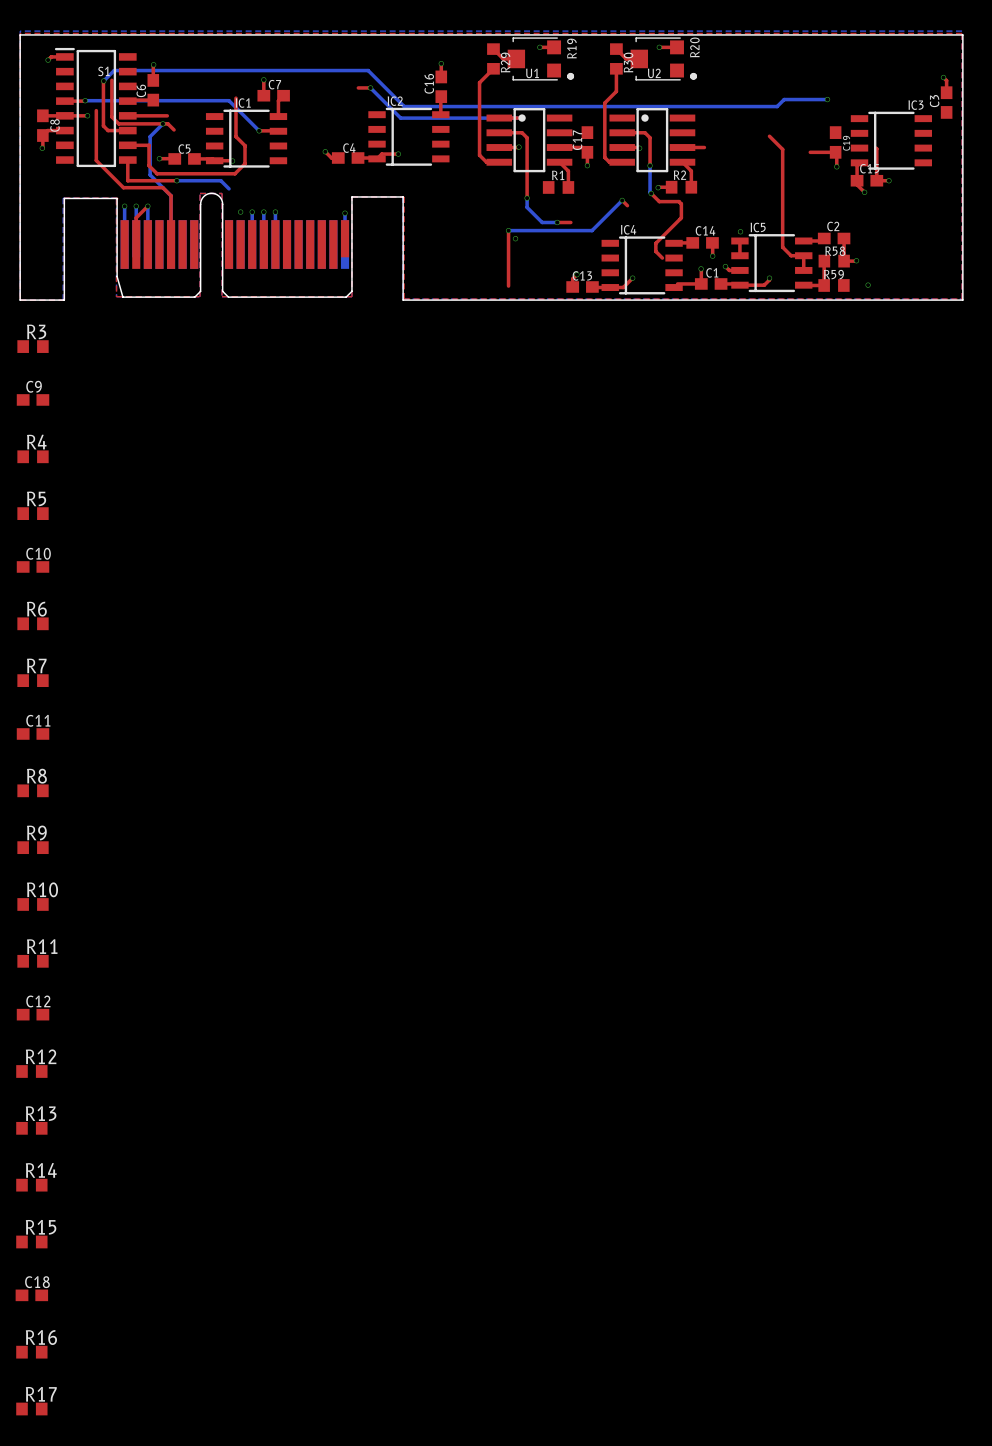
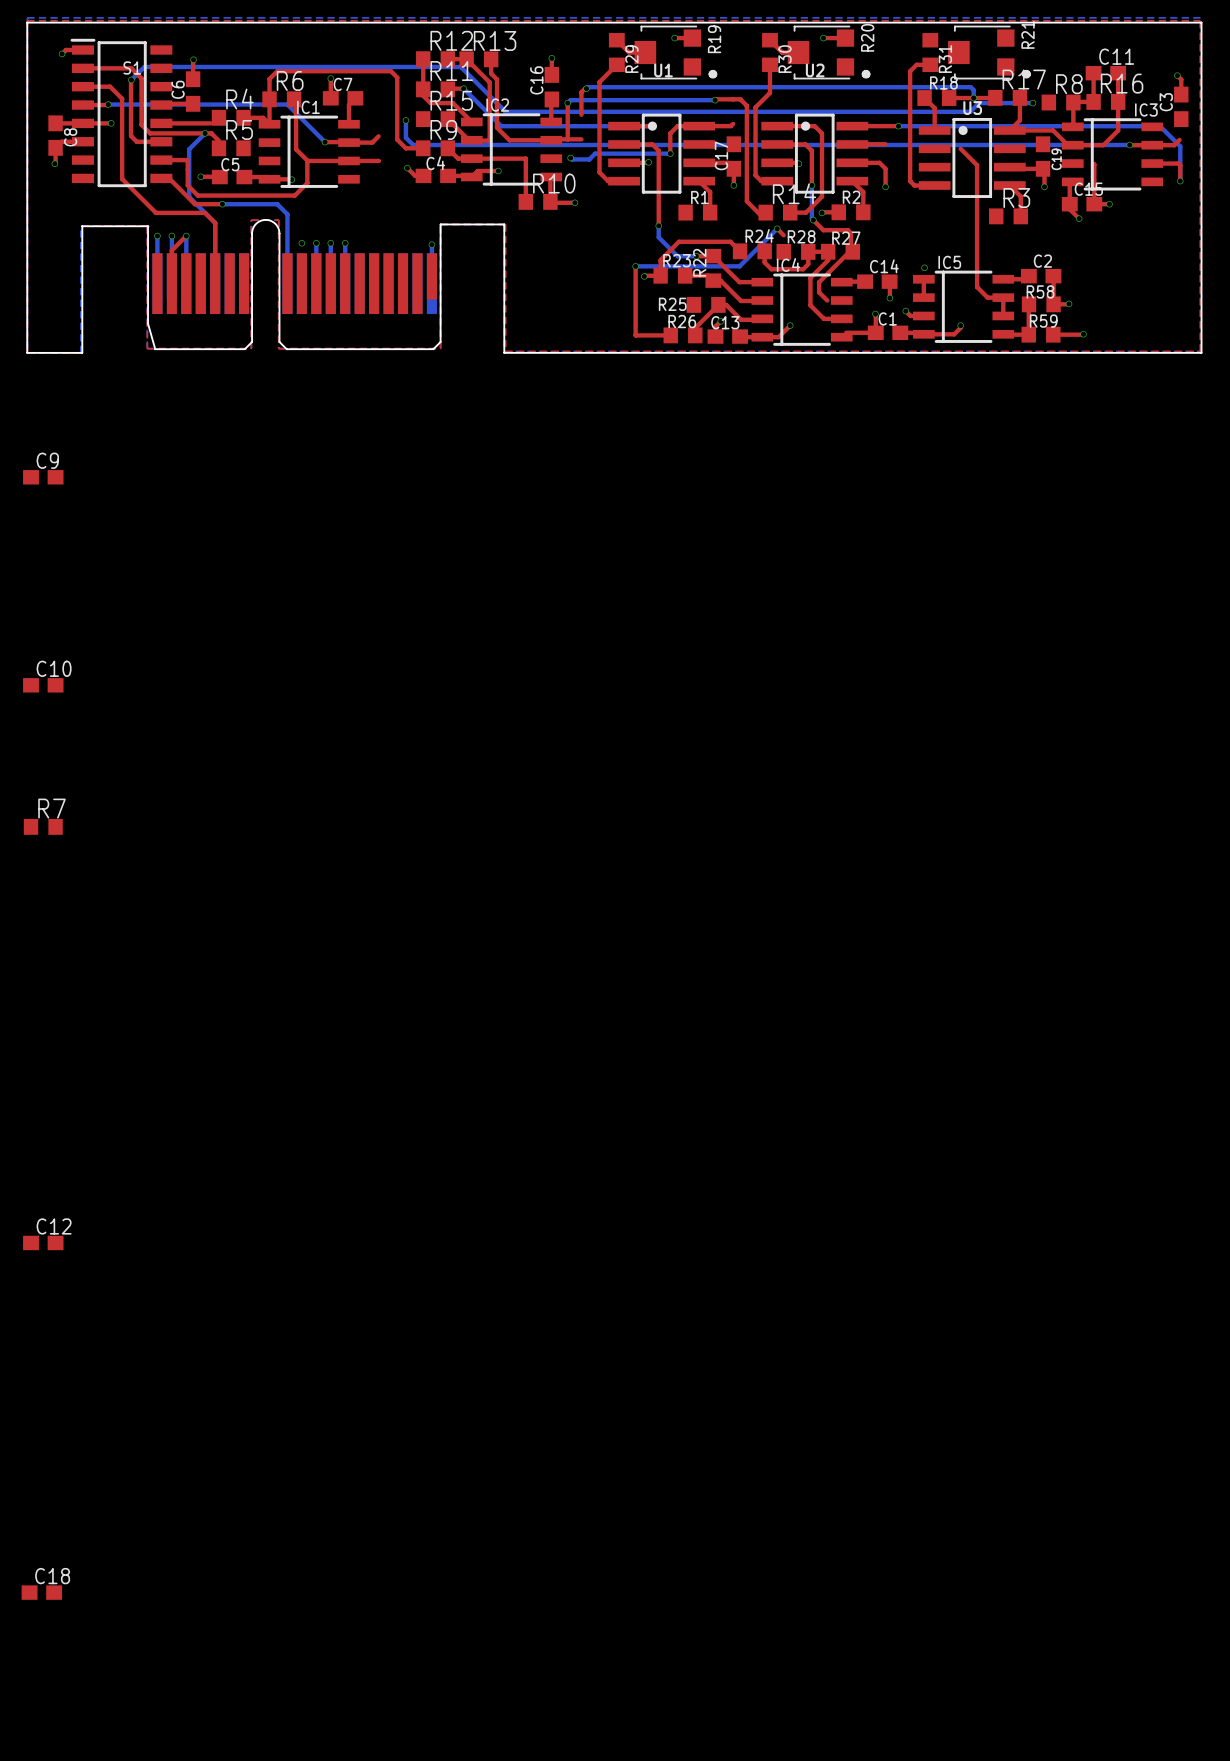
R31: none -> (930, 52)
R21: none -> (989, 52)
top track: none -> (423, 59) (423, 95) (430, 103) (452, 103) (471, 121)
top track: none -> (447, 59) (466, 59) (489, 82) (489, 139) (469, 140) (447, 119)
top track: none -> (491, 59) (491, 73) (497, 79) (497, 127) (509, 140) (581, 139)
top track: none -> (930, 64) (916, 64) (910, 71) (910, 181) (914, 185) (934, 185)
top track: none -> (85, 68) (131, 68) (141, 79)
top track: none -> (1093, 73) (1093, 101) (1073, 102) (1072, 126)
top track: none -> (1118, 73) (1118, 130) (1103, 145) (1067, 145) (1053, 130) (1009, 130) (1019, 120) (1019, 97)
top track: none -> (85, 86) (110, 86) (122, 98) (122, 116)
top track: none -> (586, 88) (581, 92) (581, 114)
bottom track: none -> (586, 88) (970, 87) (973, 90) (973, 98)
via: none -> (586, 88)
top track: none -> (924, 98) (934, 108) (934, 130)
R18: none -> (936, 98)
top track: none -> (949, 98) (995, 98)
via: none -> (973, 98)
top track: none -> (715, 100) (740, 99) (746, 105) (746, 201) (761, 215) (765, 212)
bottom track: none -> (715, 100) (570, 100) (567, 103)
via: none -> (715, 100)
top track: none -> (567, 103) (567, 139)
via: none -> (567, 103)
top track: none -> (243, 117) (263, 117) (269, 124) (269, 79) (277, 71) (390, 71) (397, 77) (397, 139) (405, 148) (423, 148)
bottom track: none -> (405, 120) (405, 137) (413, 144) (1129, 144)
via: none -> (405, 120)
top track: none -> (733, 123) (730, 126) (677, 126) (670, 133) (670, 153)
top track: none -> (777, 126) (814, 126) (821, 133) (821, 196) (806, 212) (790, 212)
top track: none -> (852, 126) (898, 126)
bottom track: none -> (898, 126) (1160, 126) (1180, 146) (1180, 181)
via: none -> (898, 126)
top track: none -> (378, 136) (372, 142) (348, 142)
top track: none -> (1179, 139) (1174, 145) (1129, 144)
top track: none -> (852, 144) (885, 144)
via: none -> (1129, 144)
top track: none -> (447, 148) (458, 158) (525, 158) (525, 201)
bottom track: none -> (670, 153) (595, 153) (589, 159) (570, 157)
via: none -> (670, 153)
via: none -> (570, 157)
U3: none -> (972, 157)
top track: none -> (307, 160) (378, 160)
top track: none -> (879, 162) (885, 168) (885, 186)
top track: none -> (1152, 163) (1178, 163) (1180, 181)
top track: none -> (551, 176) (550, 201) (574, 202)
top track: (127, 160) (127, 180) (154, 180) -> (164, 178) (169, 178) (194, 204)
via: none -> (1180, 181)
top track: none -> (1009, 185) (1020, 196) (1020, 216)
via: none -> (885, 186)
via: none -> (574, 202)
bottom track: none -> (287, 214) (287, 283)
top track: none -> (740, 251) (730, 241) (678, 241) (660, 260) (660, 275) (645, 275)
R24: none -> (752, 251)
top track: none -> (764, 251) (764, 262) (771, 269) (803, 269) (808, 264) (808, 251)
top track: none -> (808, 251) (828, 251) (828, 260) (810, 277) (810, 305) (823, 318) (841, 318)
R27: none -> (840, 251)
R28: none -> (795, 251)
top track: none -> (713, 256) (739, 282) (762, 282)
R22: none -> (713, 268)
R23: none -> (672, 275)
top track: none -> (685, 275) (708, 275) (713, 280) (720, 280) (741, 301) (762, 300)
R25: none -> (706, 304)
top track: none -> (762, 318) (741, 319) (726, 304) (718, 304) (695, 328) (695, 335)
top track: none -> (1053, 334) (1083, 334)
top track: none -> (635, 335) (670, 335)
R26: none -> (683, 335)
R3 position: (33, 346) -> (1008, 216)
R4 position: (33, 456) -> (231, 117)
R5 position: (33, 513) -> (231, 148)
R6 position: (33, 623) -> (281, 99)
C11 position: (33, 733) -> (1105, 73)
R8 position: (33, 790) -> (1061, 102)
R9 position: (33, 847) -> (435, 148)
R10 position: (33, 904) -> (538, 201)
R11 position: (33, 961) -> (435, 89)
R12 position: (31, 1071) -> (435, 59)
R13 position: (31, 1128) -> (478, 59)
R14 position: (31, 1185) -> (777, 212)
R15 position: (31, 1241) -> (435, 119)
R16 position: (31, 1352) -> (1105, 101)
R17 position: (31, 1409) -> (1007, 97)

